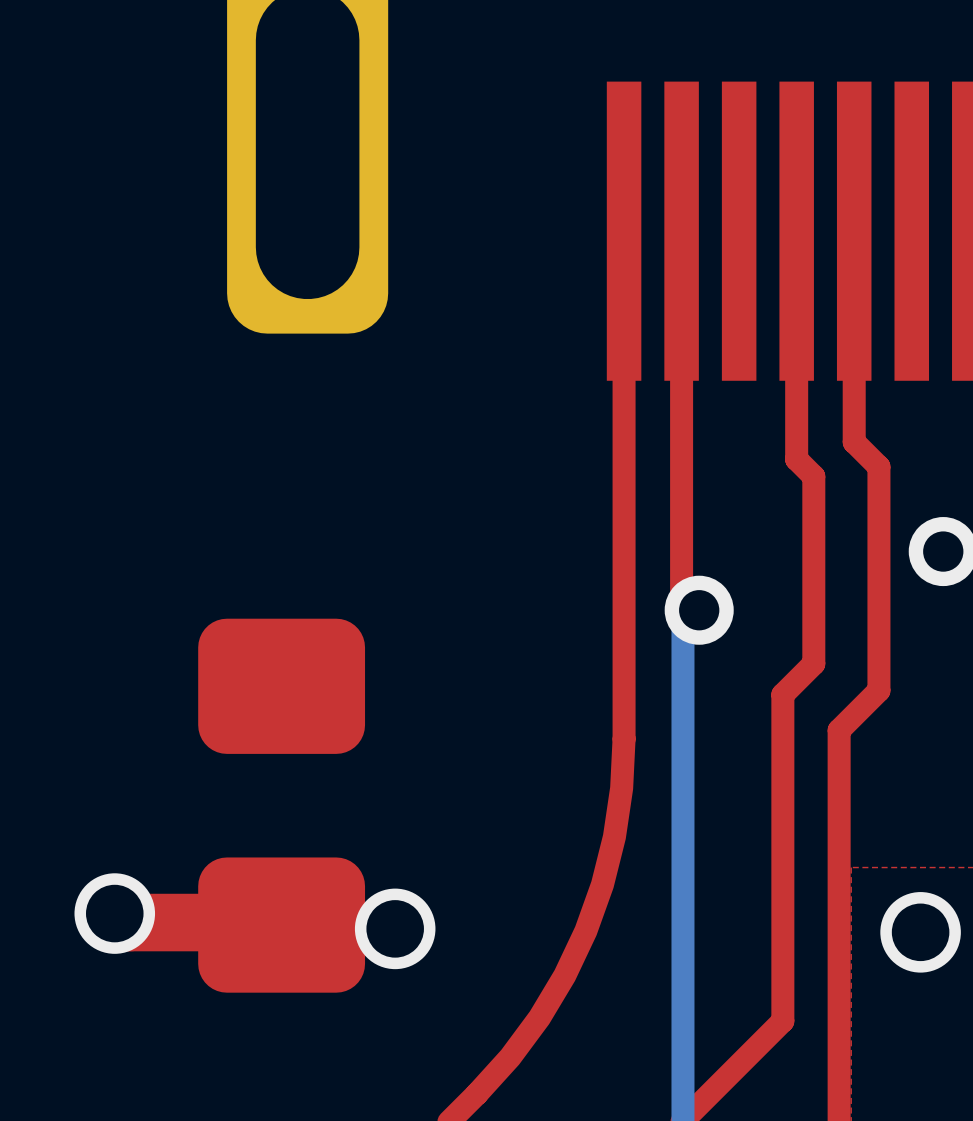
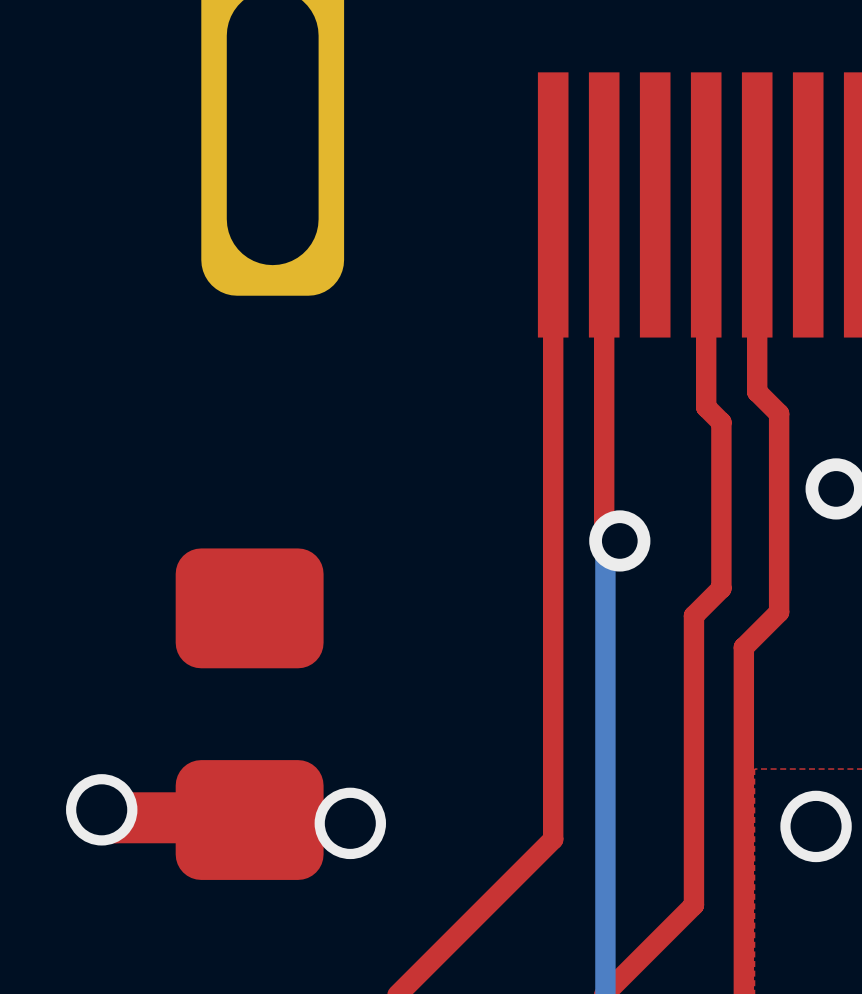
top track: (624, 738) (621, 788) (614, 836) (602, 884) (585, 930) (564, 975) (539, 1017) (510, 1057) (477, 1093) -> (553, 655) (553, 839) (422, 969)

